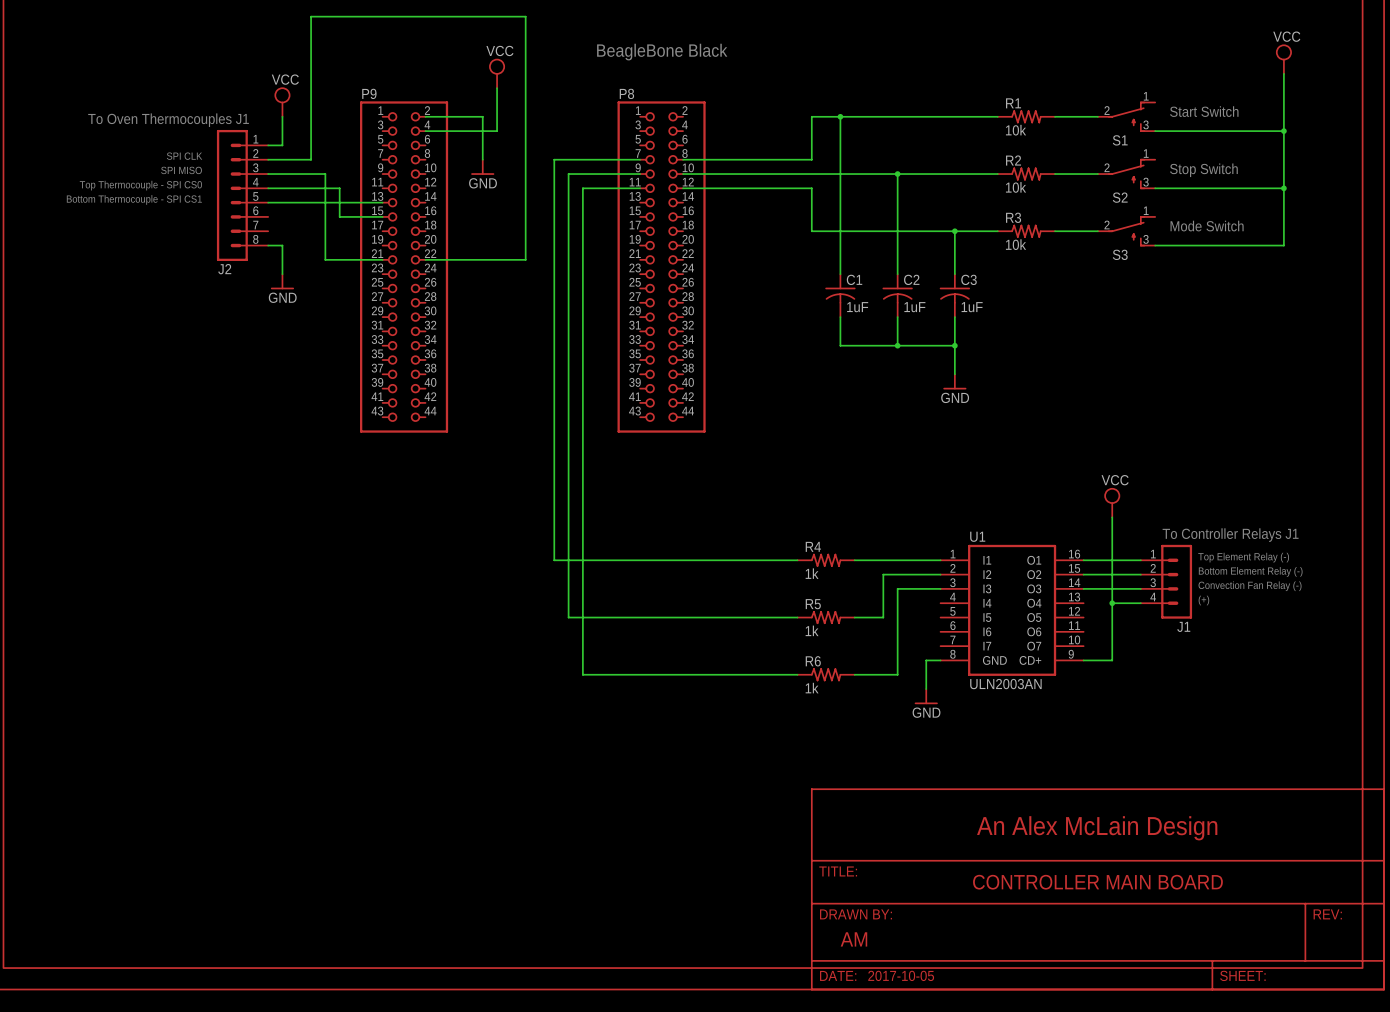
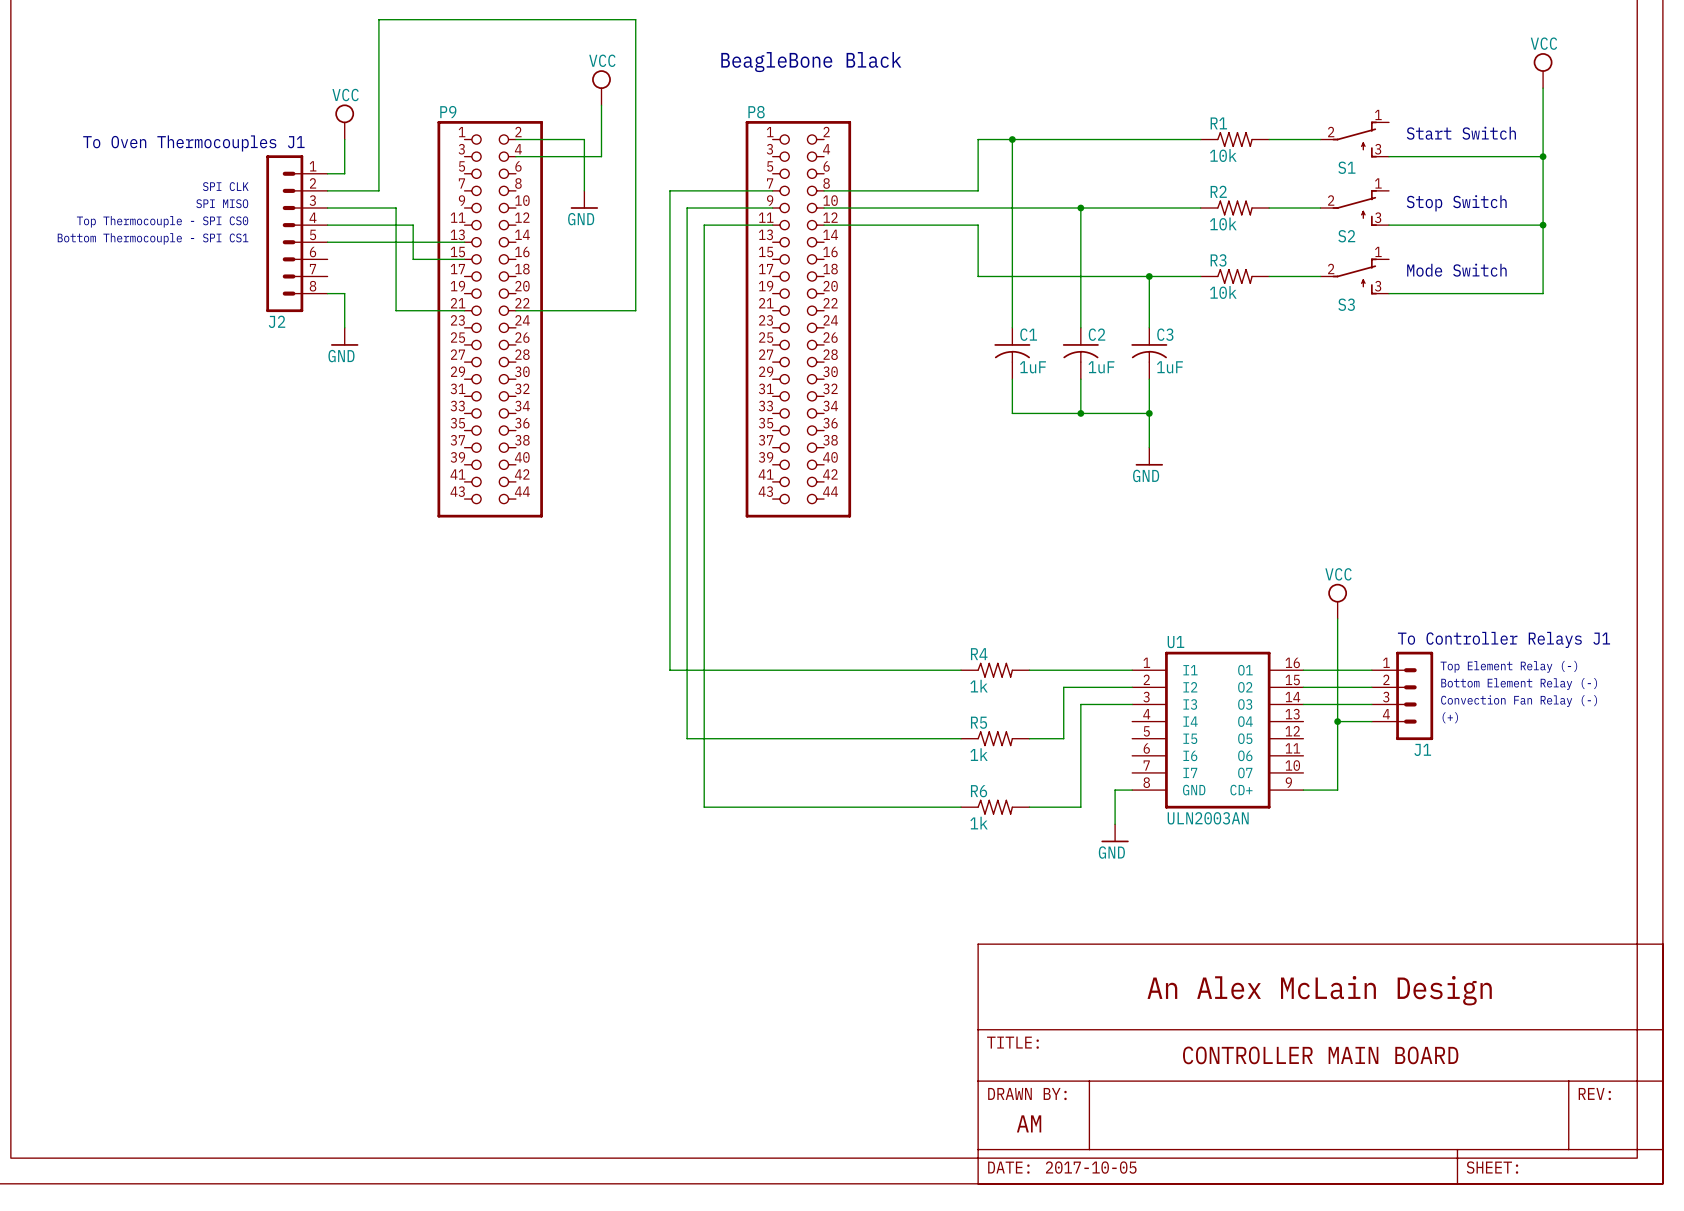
part symbol: [811, 788, 1385, 990] -> [977, 943, 1664, 1185]

